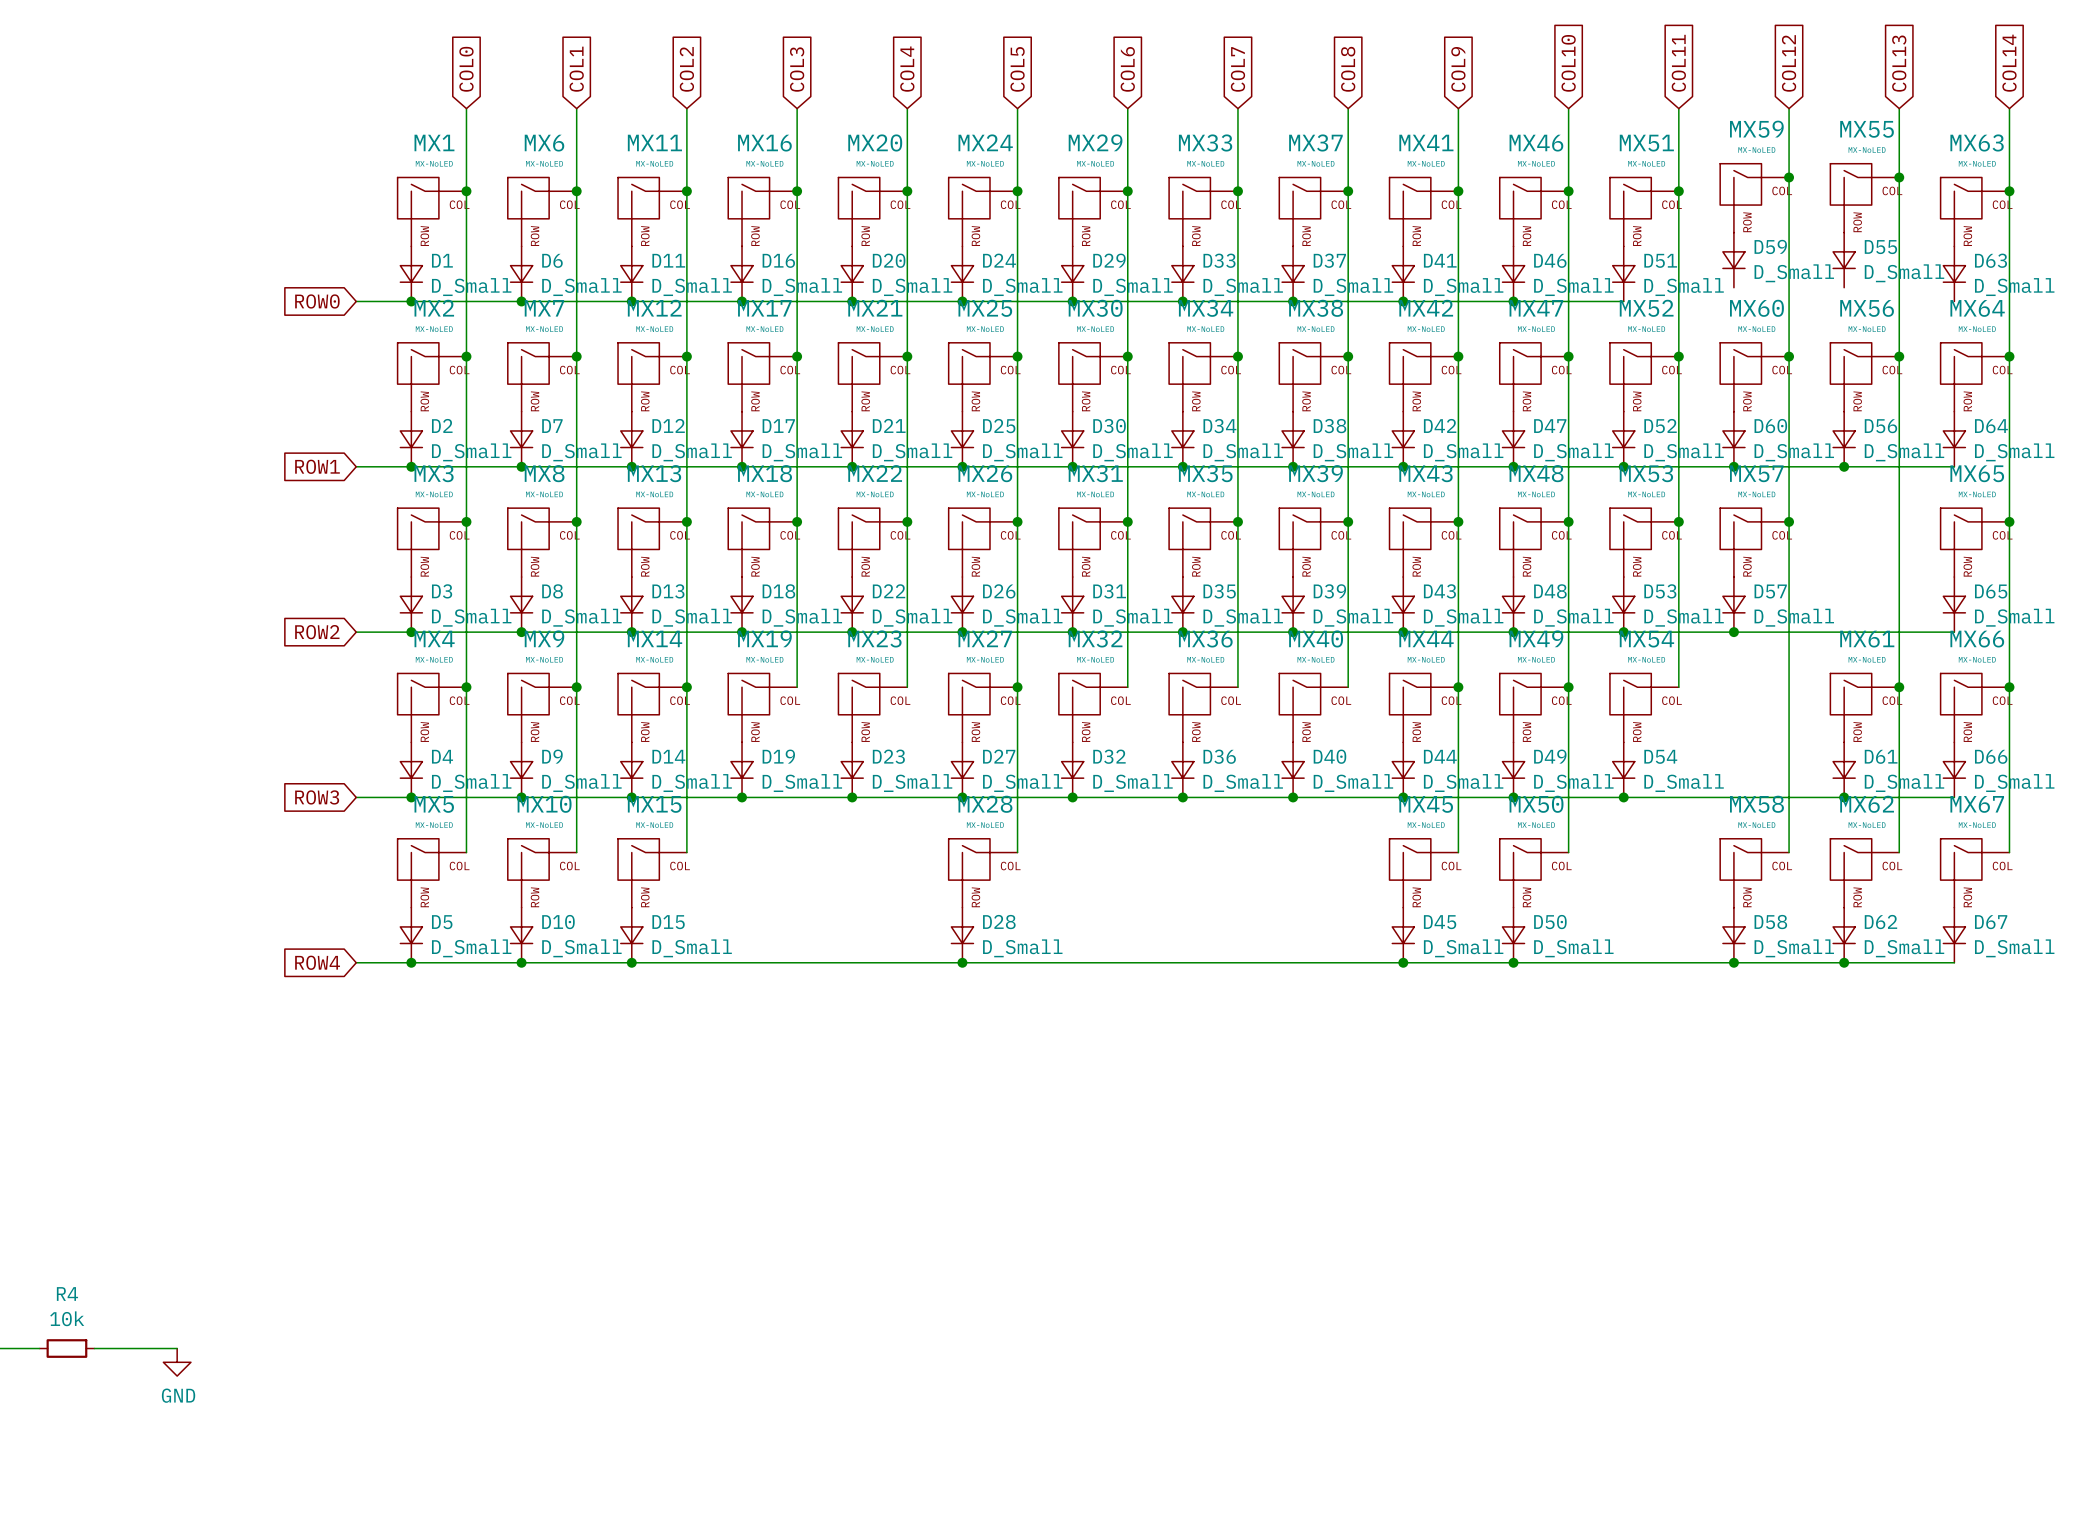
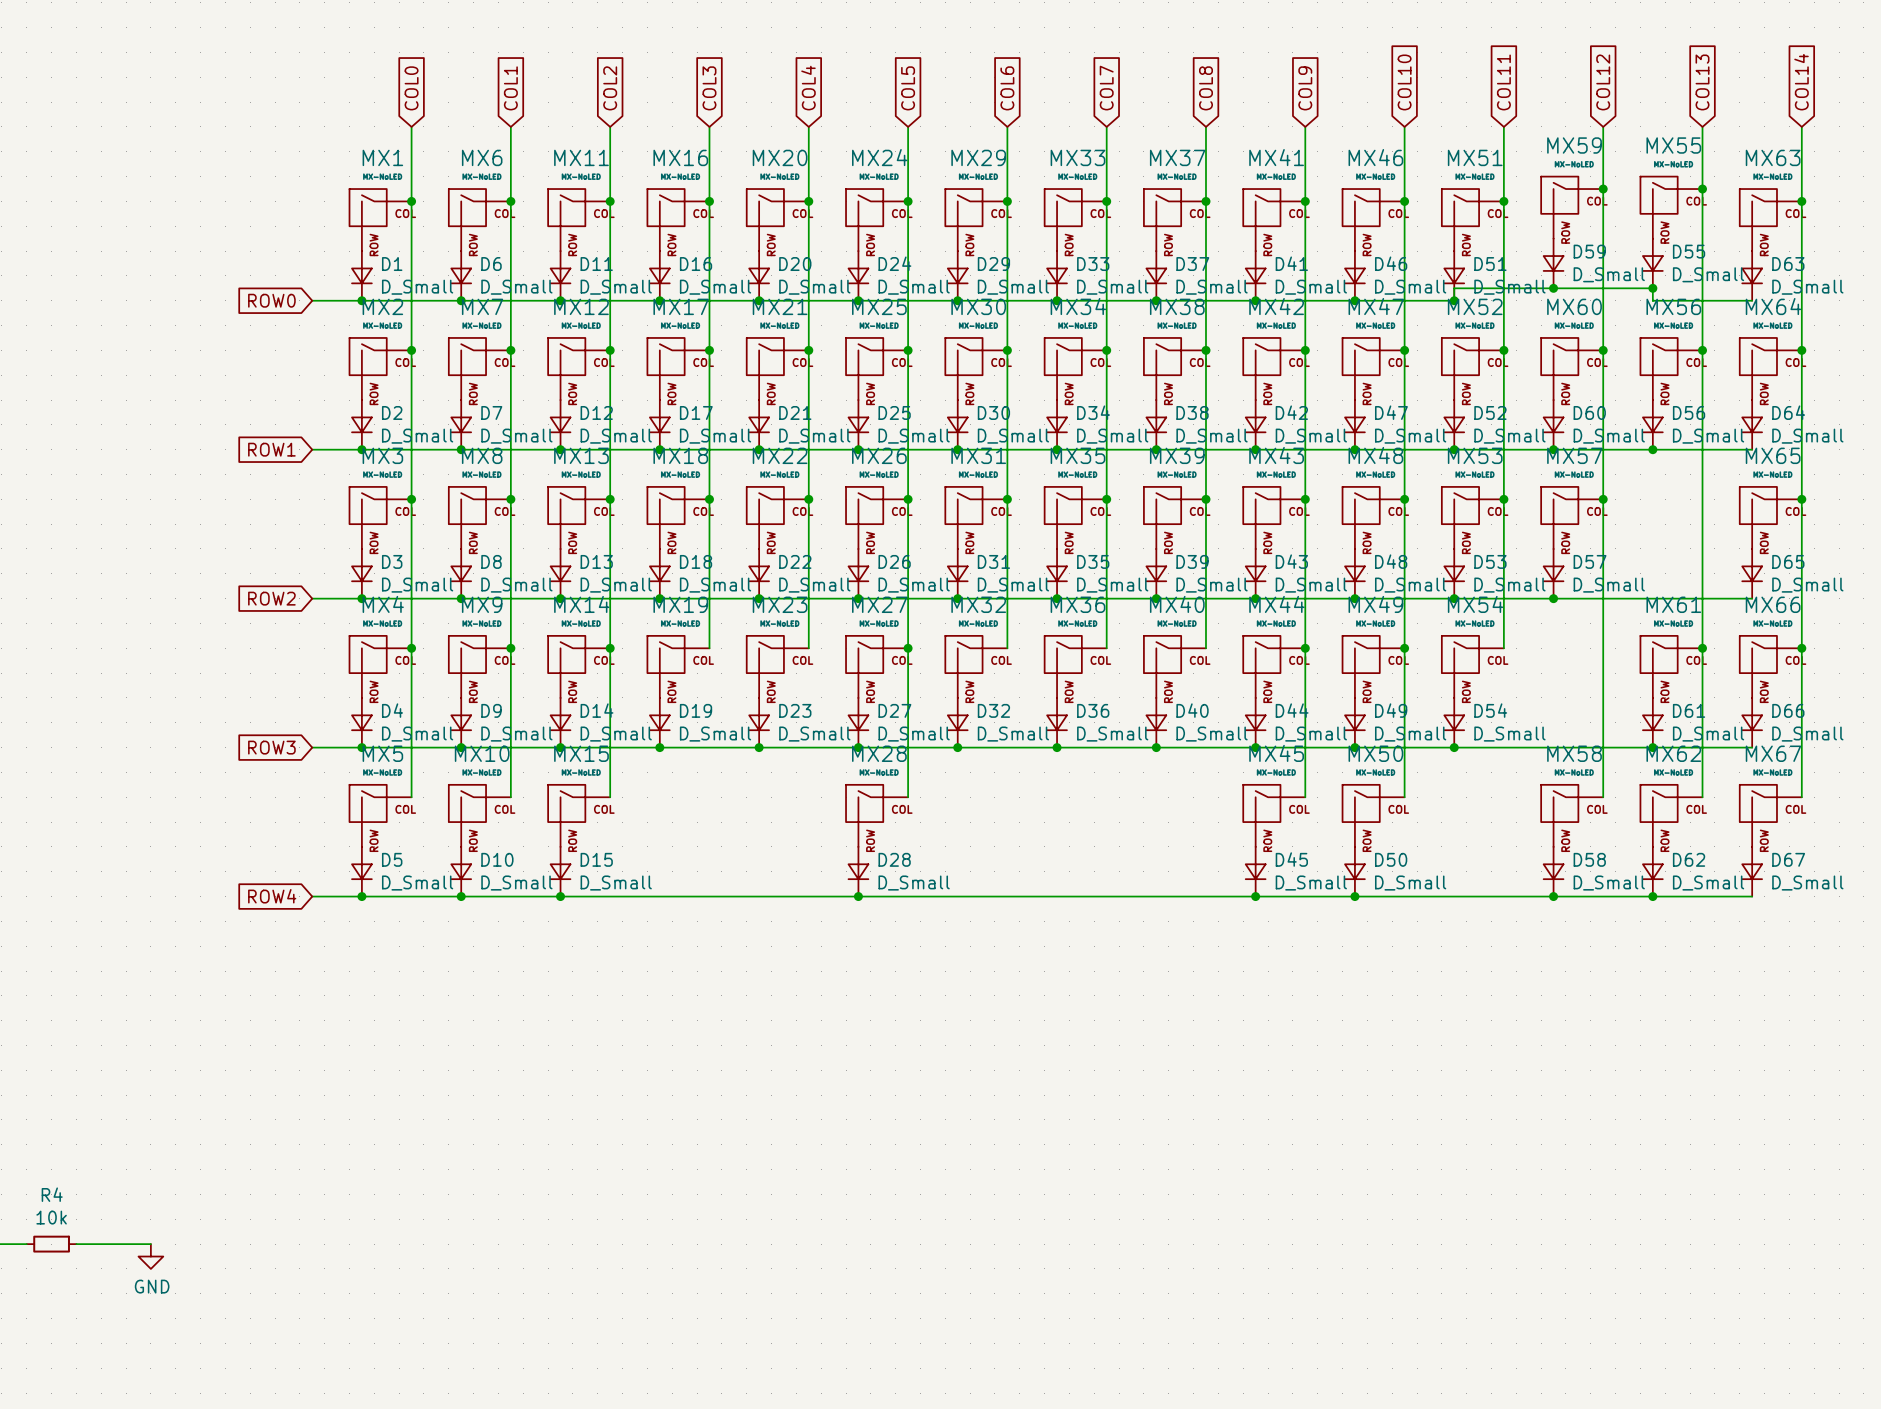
junction: none -> (1553, 288)
junction: none -> (1652, 288)
wire: none -> (1454, 300) (1454, 288) (1652, 288) (1652, 300) (1752, 300)
junction: none -> (1454, 300)

